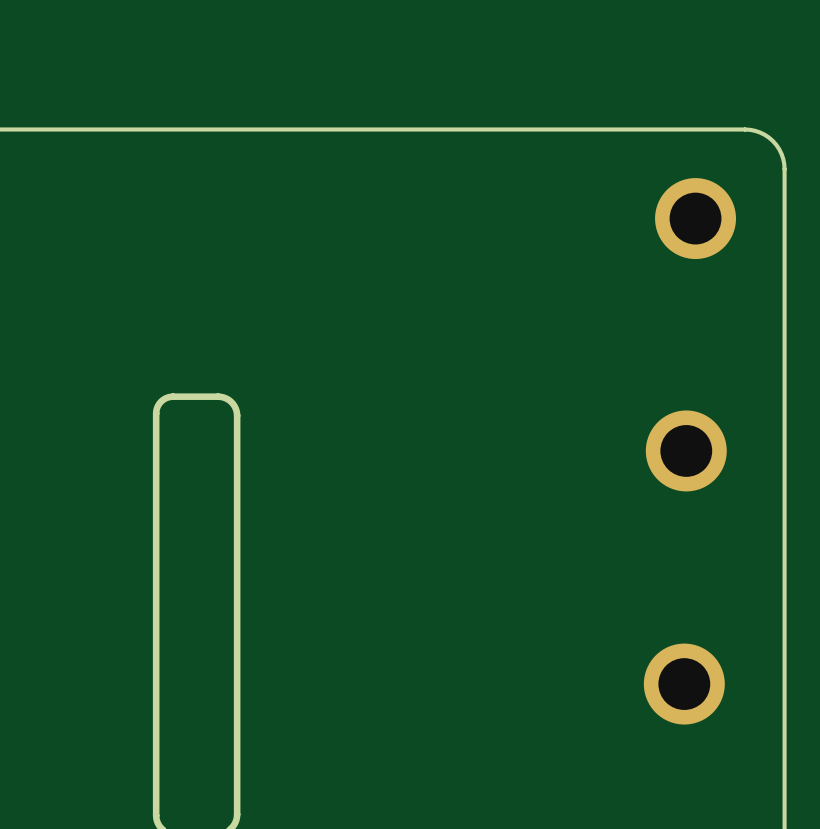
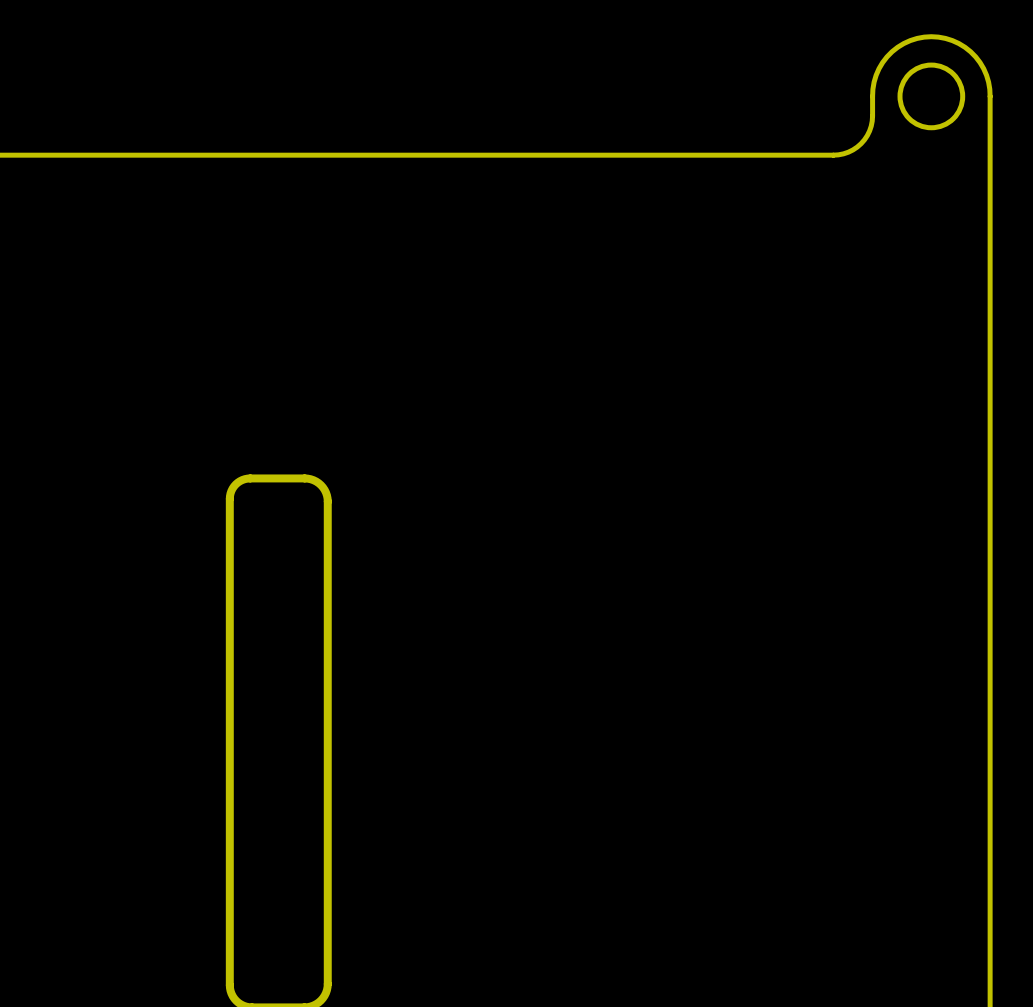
round board edge: none -> [897, 62, 966, 131]
board edge: (655, 129) (755, 130) (764, 134) (776, 145) (781, 153) (784, 169) -> (833, 155) (852, 149) (867, 135) (872, 121) (874, 82) (879, 68) (887, 56) (903, 43) (917, 38) (931, 36) (945, 38) (958, 43) (975, 56) (983, 68) (988, 82) (990, 203)
part: (695, 218) -> none
part: (686, 450) -> none
part: (684, 684) -> none

